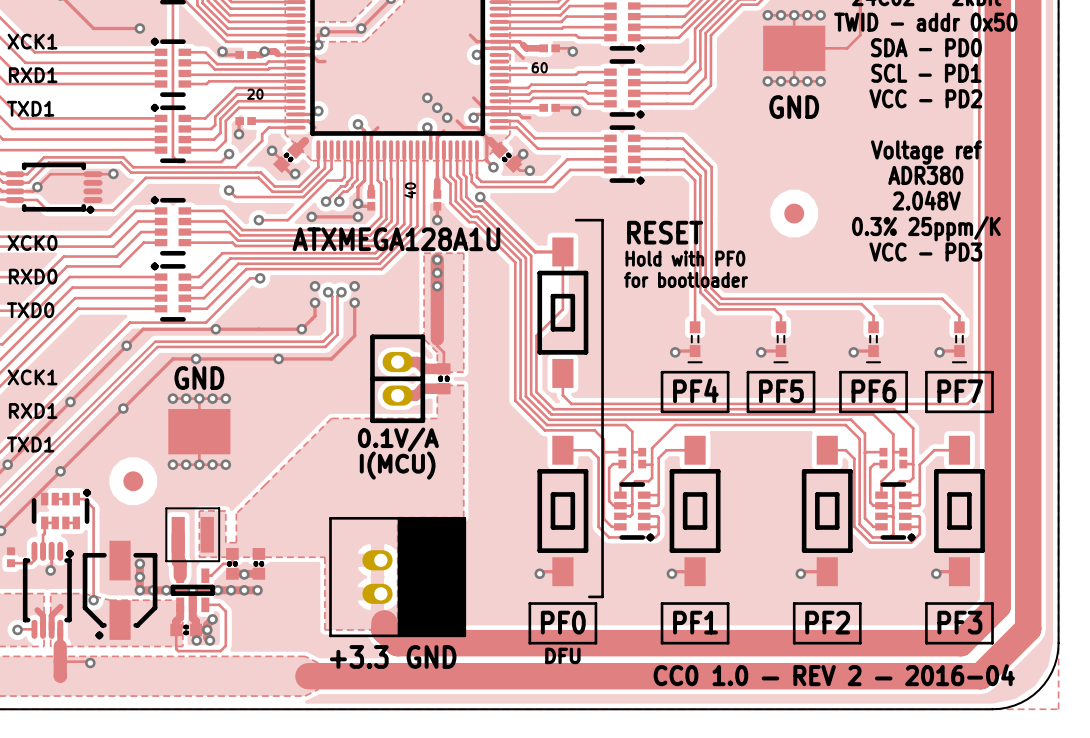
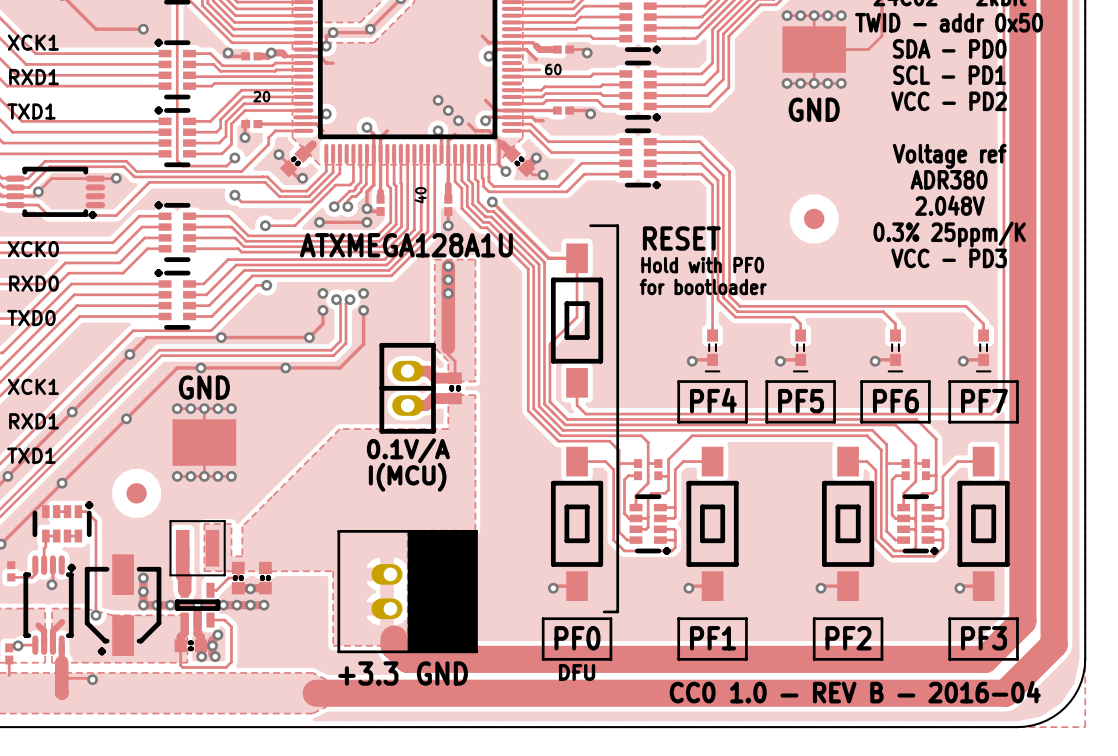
part: none -> (9, 653)
track: none -> (9, 660) (9, 675)
text: CC0 1.0 — REV 2 — 2016-04 (834, 675) -> CC0 1.0 — REV B — 2016-04 (855, 692)

